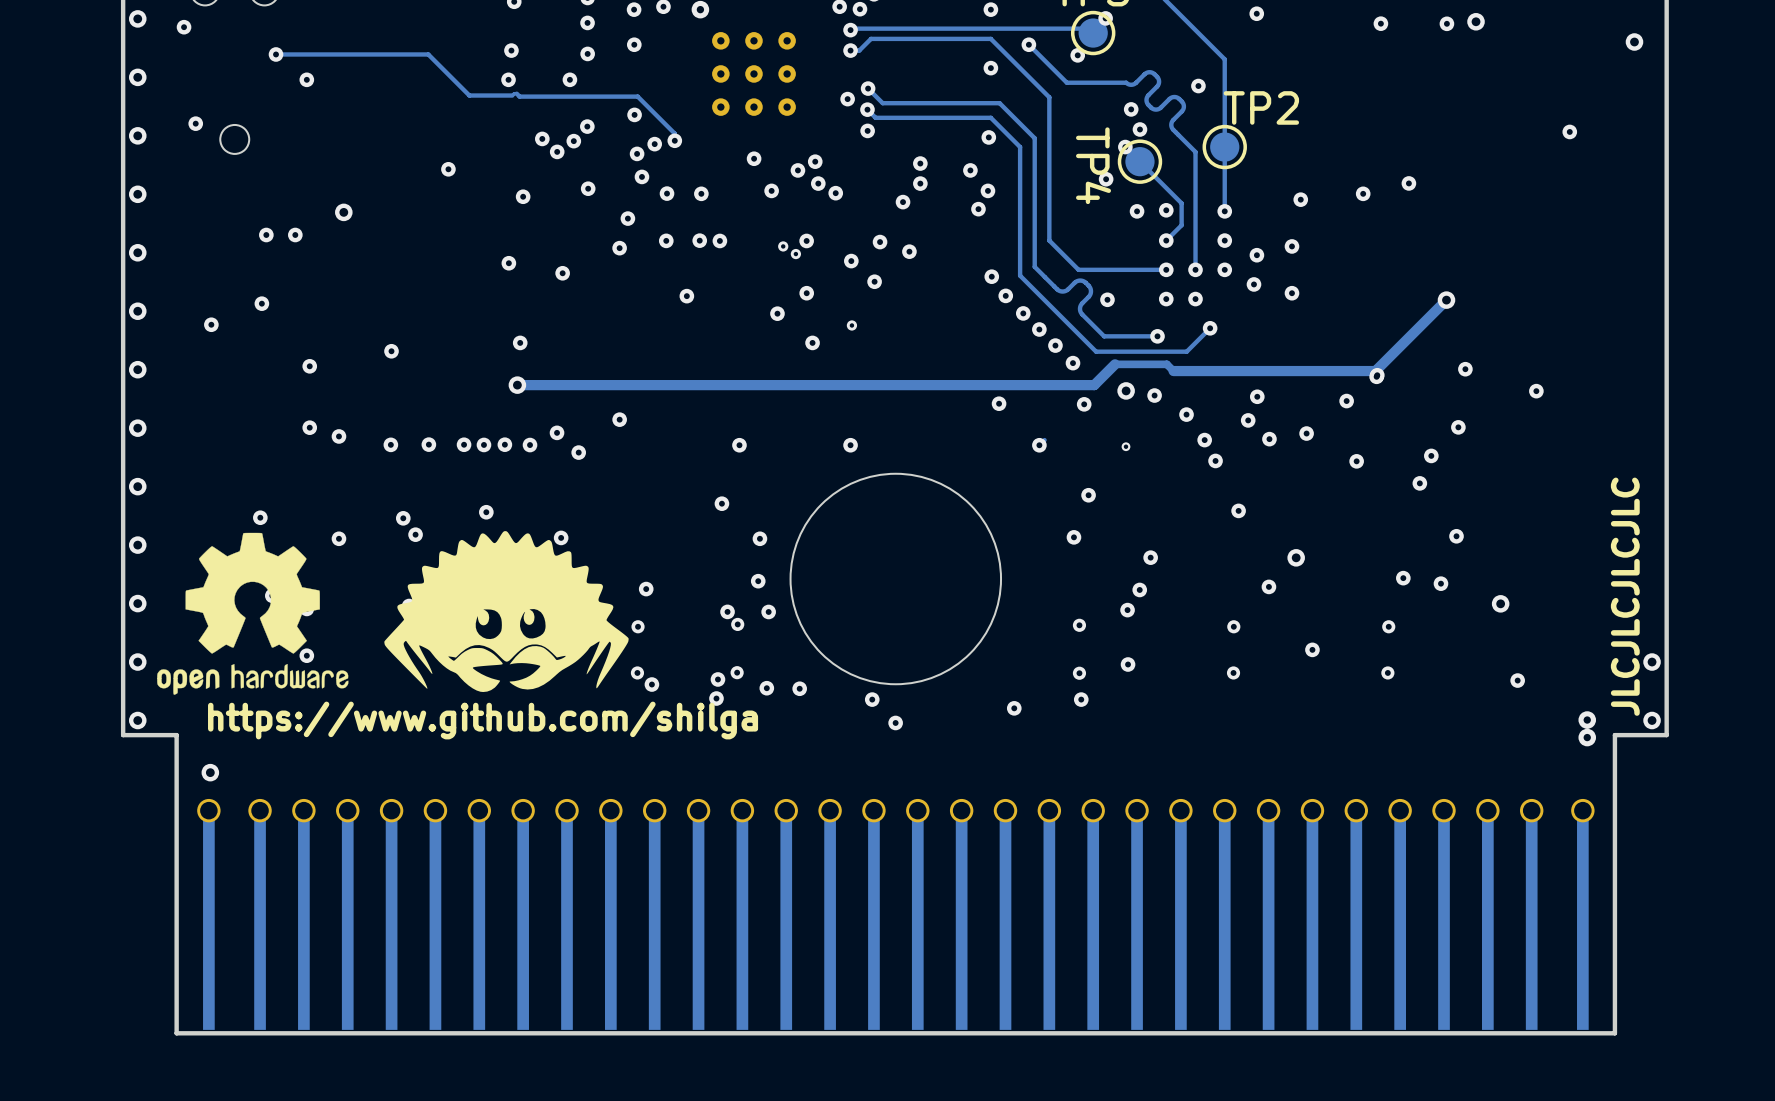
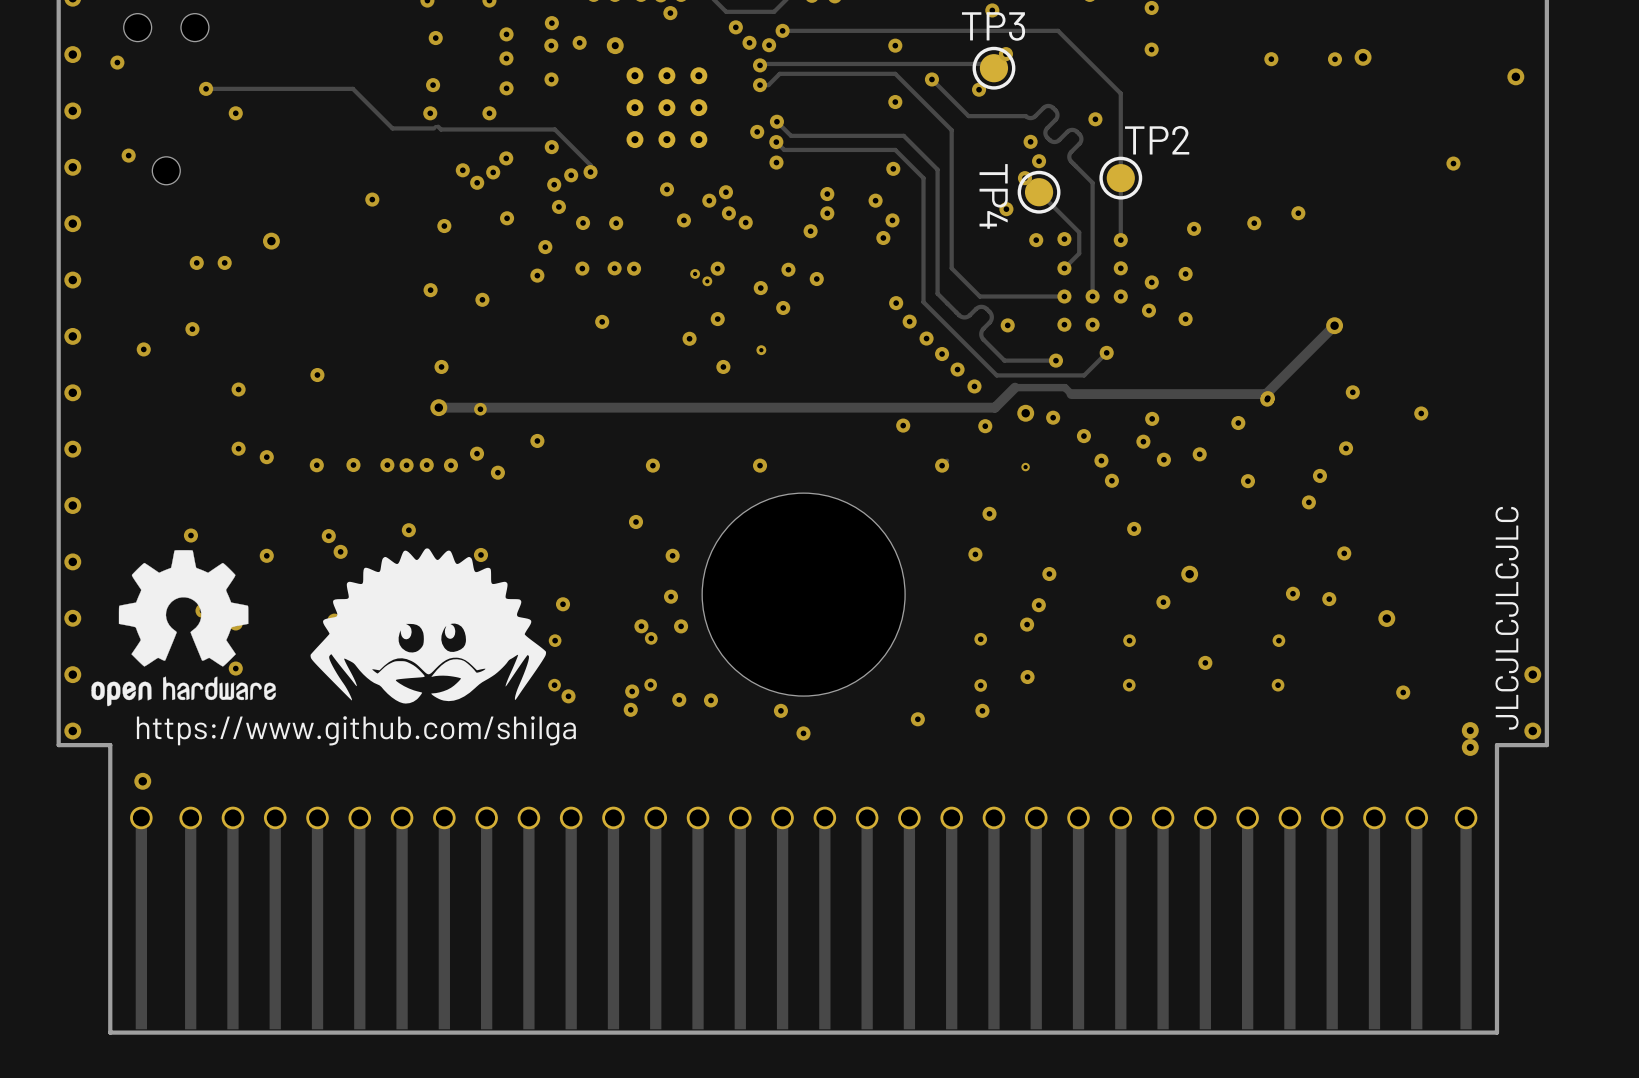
via: none -> (480, 409)

